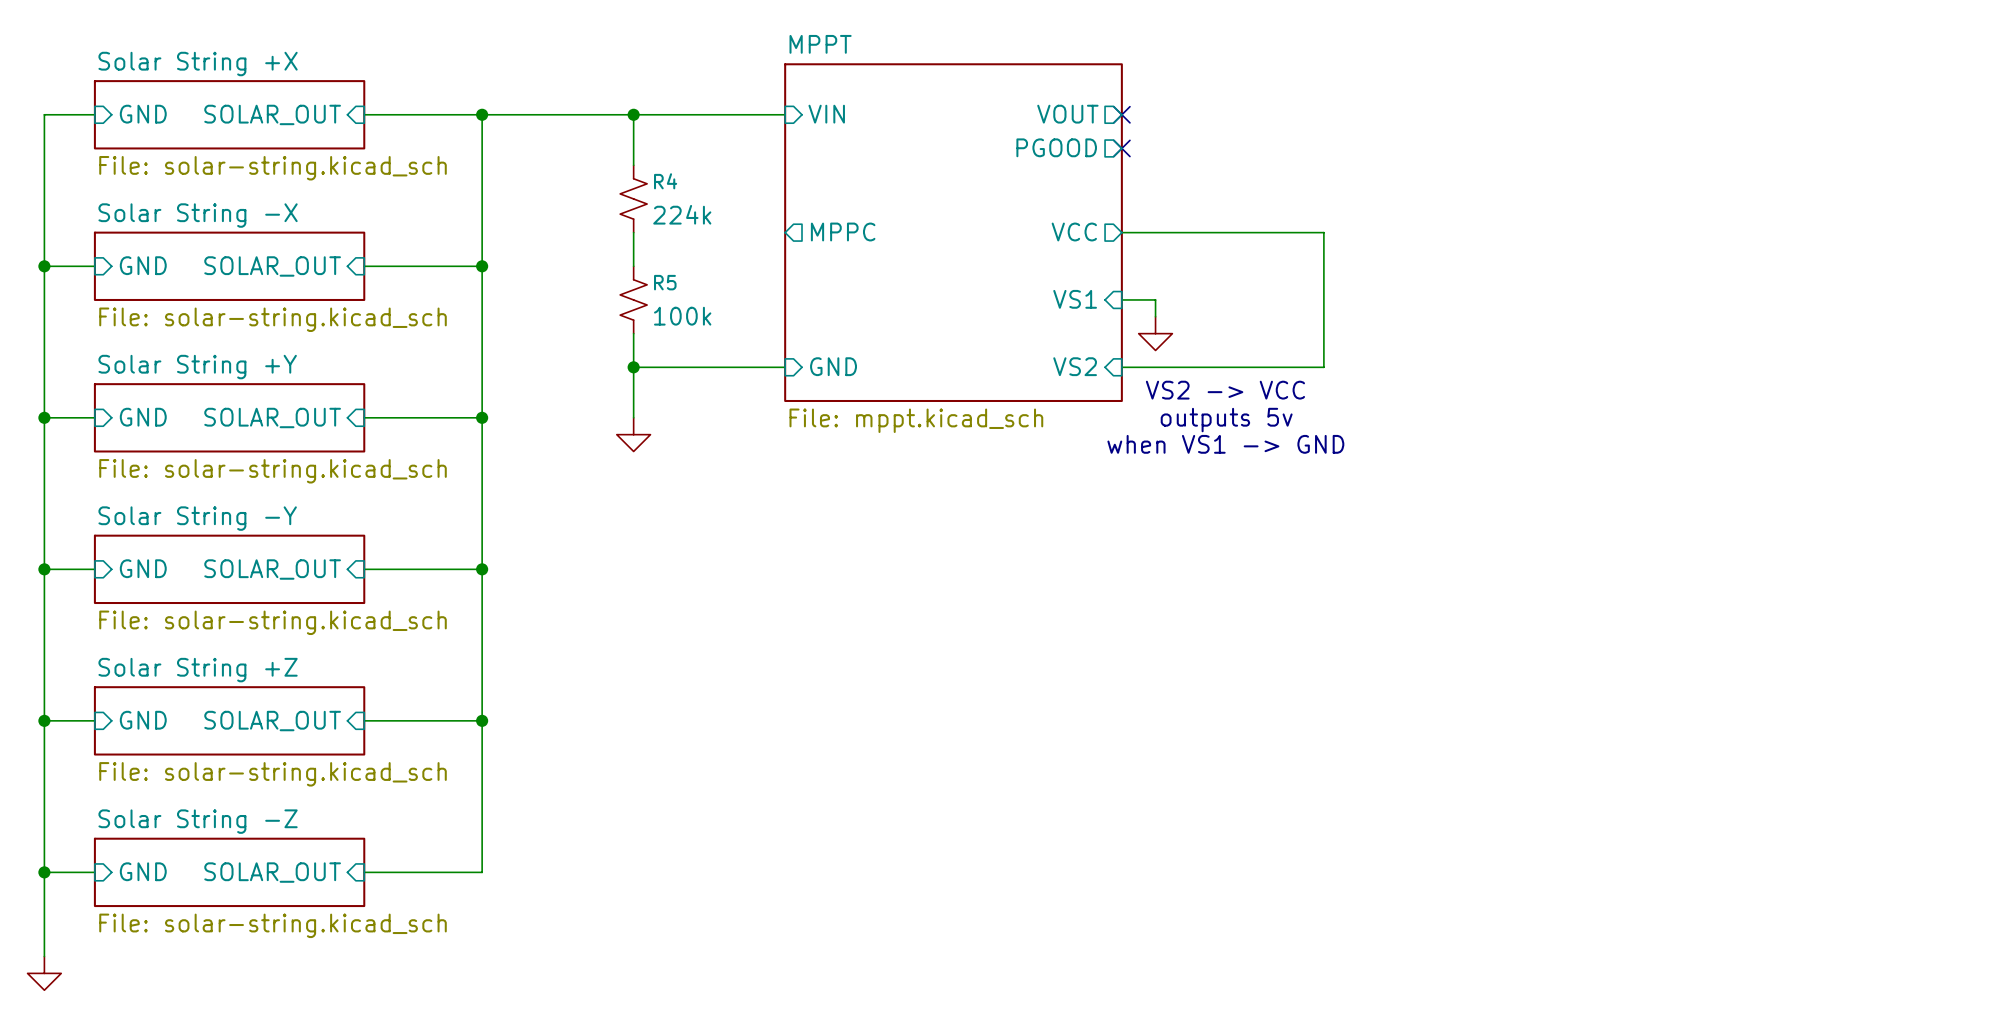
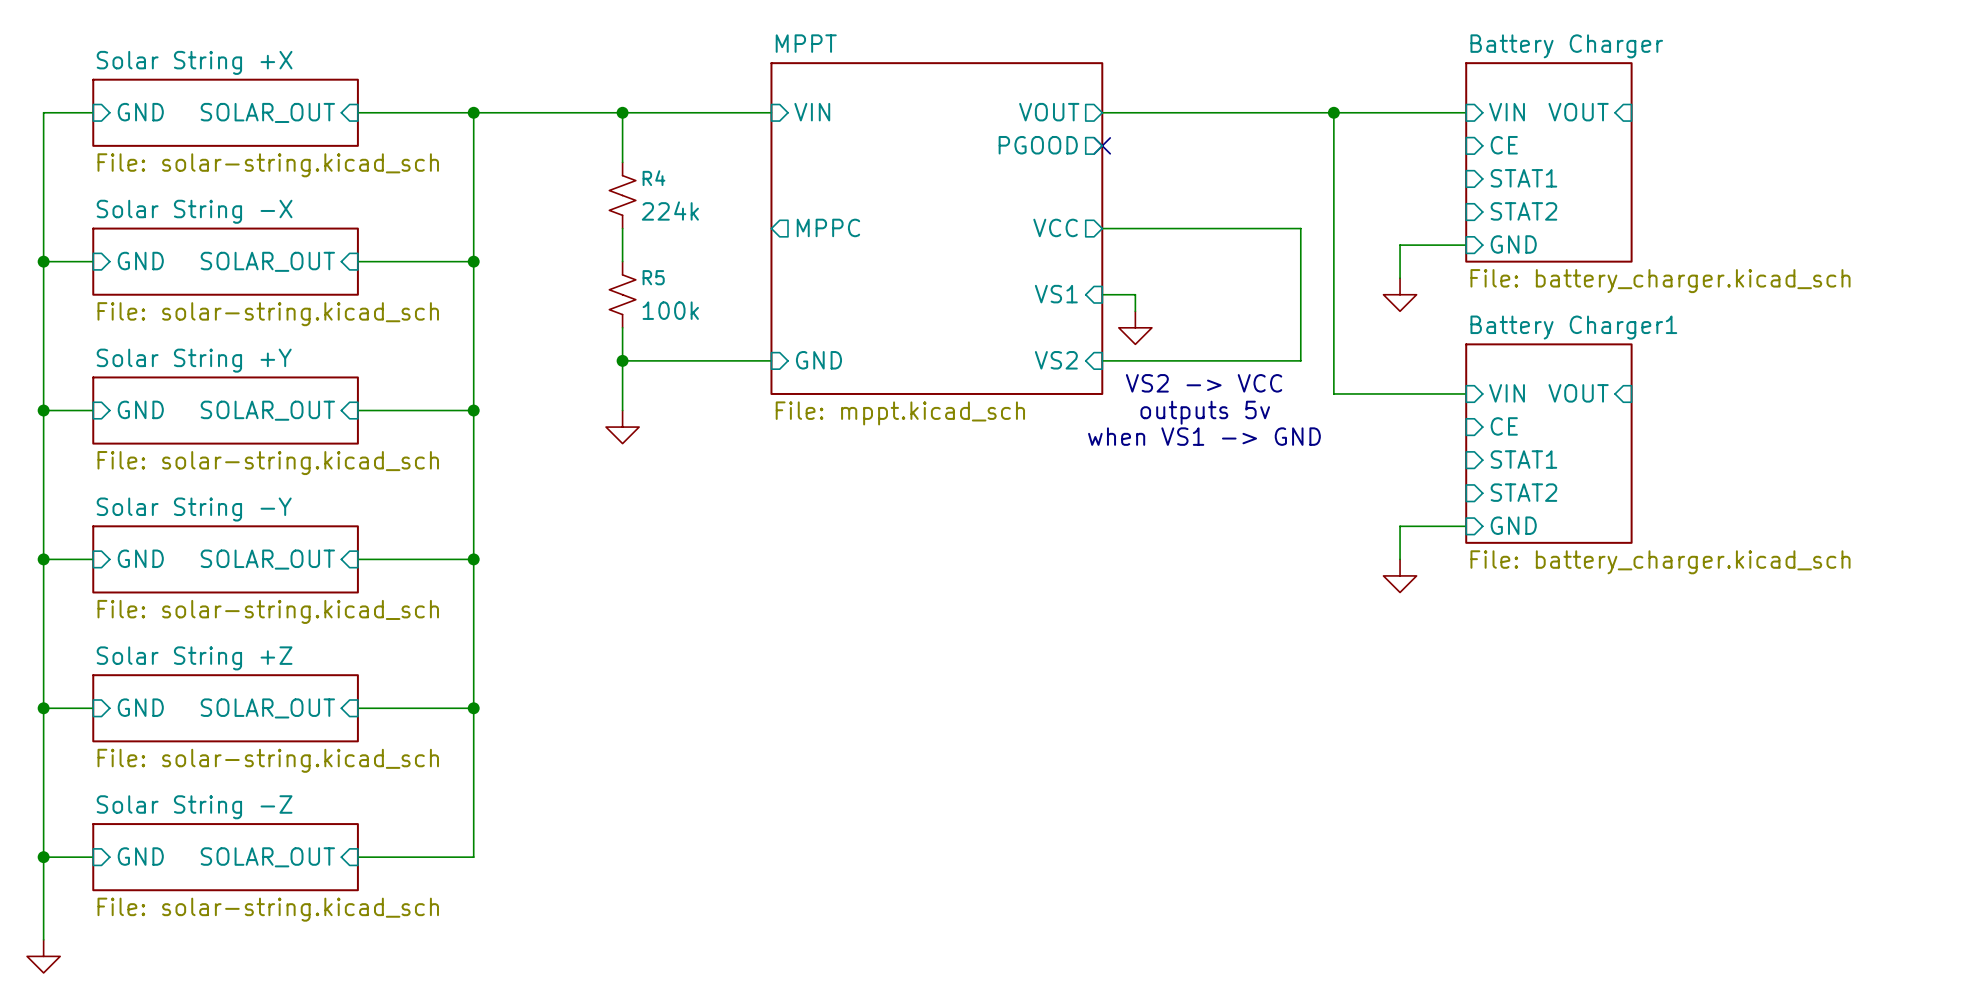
wire: none -> (1102, 112) (1466, 112)
no-connect mark: (1121, 114) -> none
wire: none -> (1333, 112) (1333, 393) (1466, 393)
junction: none -> (1333, 112)
sheet pin: none -> VIN (1507, 112)
sheet pin: none -> VOUT (1578, 112)
sheet pin: none -> CE (1504, 145)
sheet Battery Charger: none -> File: battery_charger.kicad_sch (1548, 162)
sheet pin: none -> STAT1 (1523, 178)
sheet pin: none -> STAT2 (1523, 211)
sheet pin: none -> GND (1513, 244)
wire: none -> (1466, 245) (1400, 245) (1400, 278)
power symbol: none -> (1400, 294)
sheet pin: none -> VIN (1507, 393)
sheet pin: none -> VOUT (1578, 393)
sheet pin: none -> CE (1504, 426)
sheet Battery Charger1: none -> File: battery_charger.kicad_sch (1548, 443)
sheet pin: none -> STAT1 (1523, 459)
sheet pin: none -> STAT2 (1523, 492)
wire: none -> (1466, 526) (1400, 526) (1400, 559)
sheet pin: none -> GND (1513, 525)
power symbol: none -> (1400, 575)

